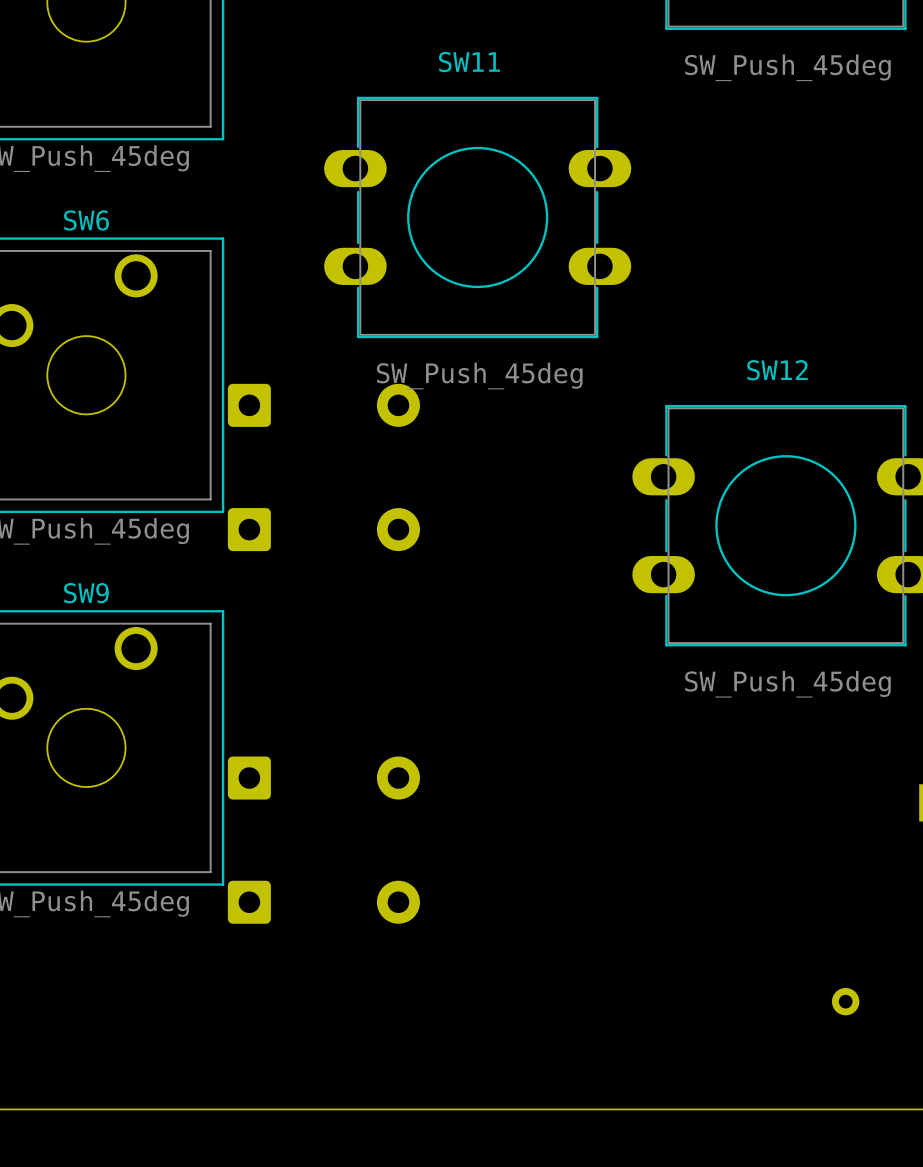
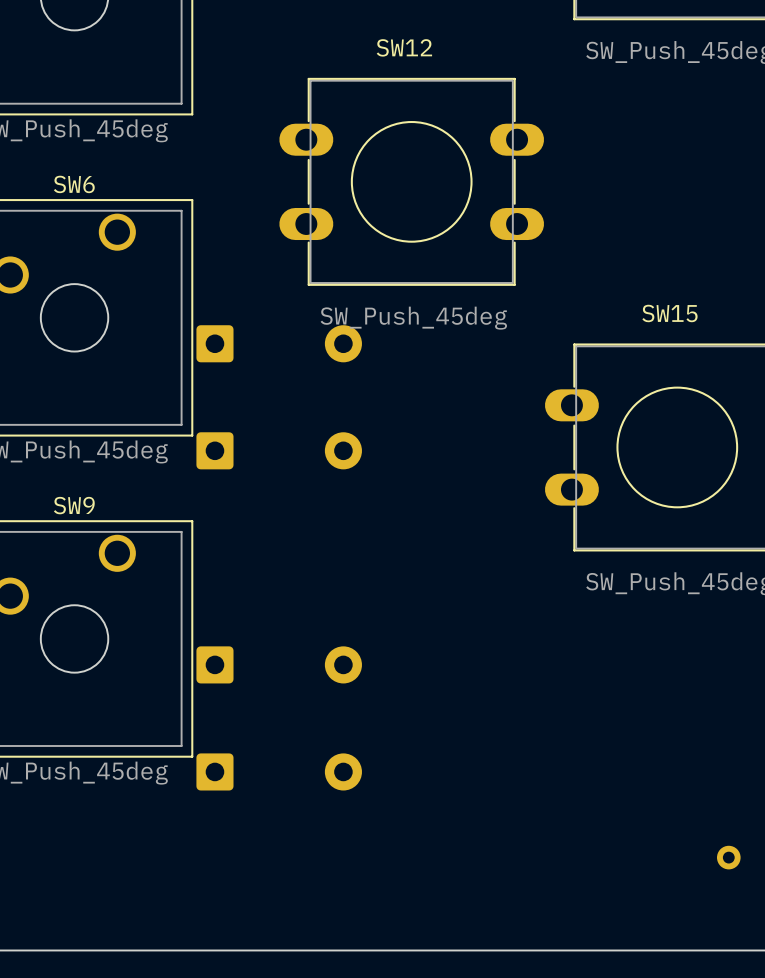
SW11 name: SW11 (469, 62) -> SW12 (404, 47)
SW12 name: SW12 (777, 370) -> SW15 (669, 313)

